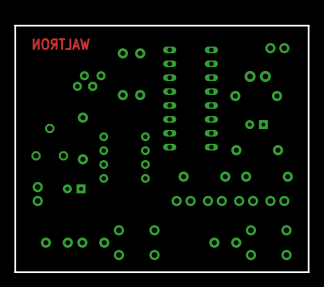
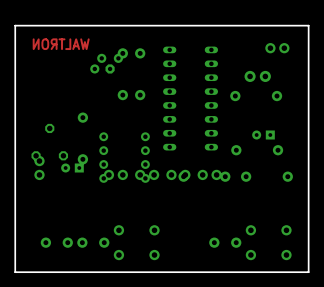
part position: (89, 81) -> (106, 63)
part position: (256, 124) -> (263, 135)
part: none -> (115, 174)
part: none -> (147, 174)
part: none -> (178, 174)
part: none -> (209, 174)
part position: (74, 188) -> (72, 167)
part position: (37, 194) -> (39, 167)
part: (183, 200) -> none
part: (214, 200) -> none
part: (246, 200) -> none
part: (277, 200) -> none

